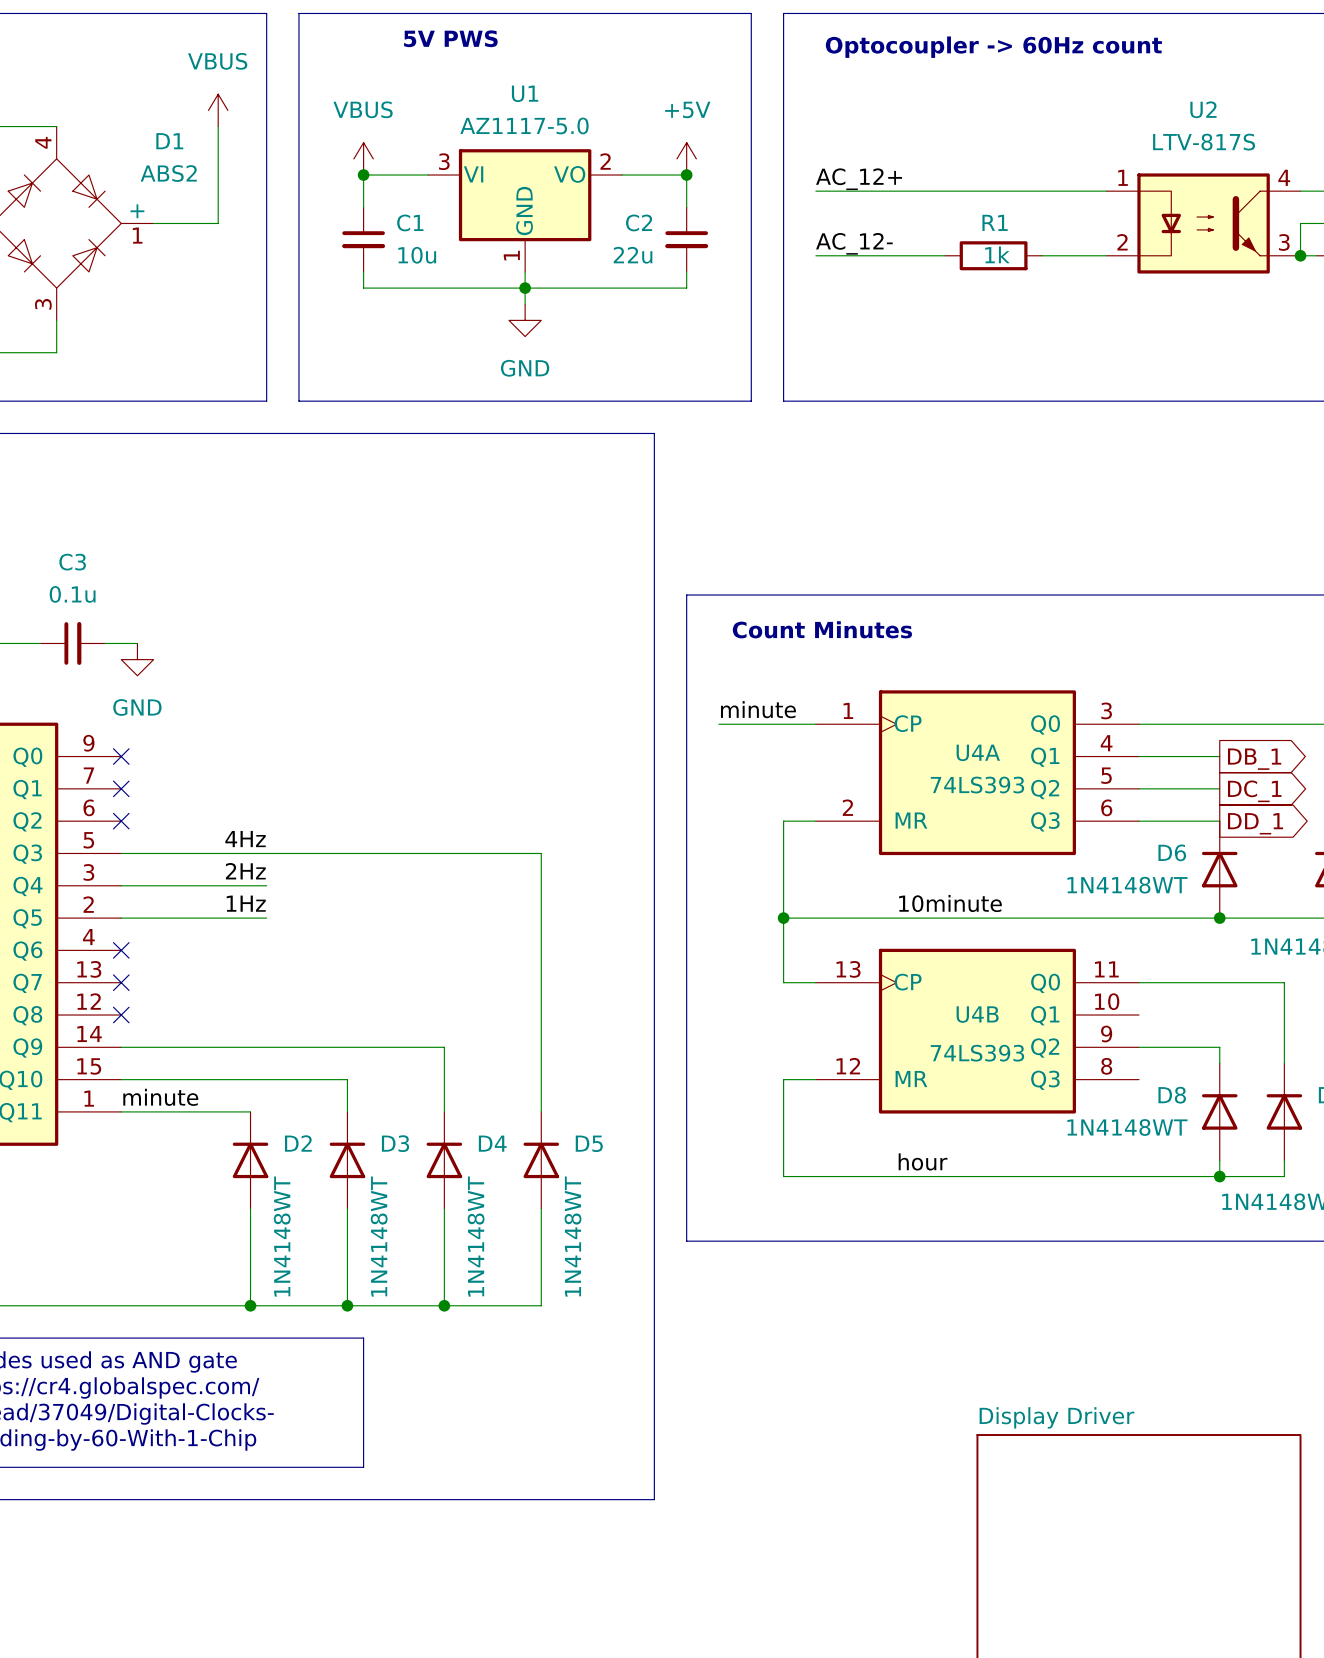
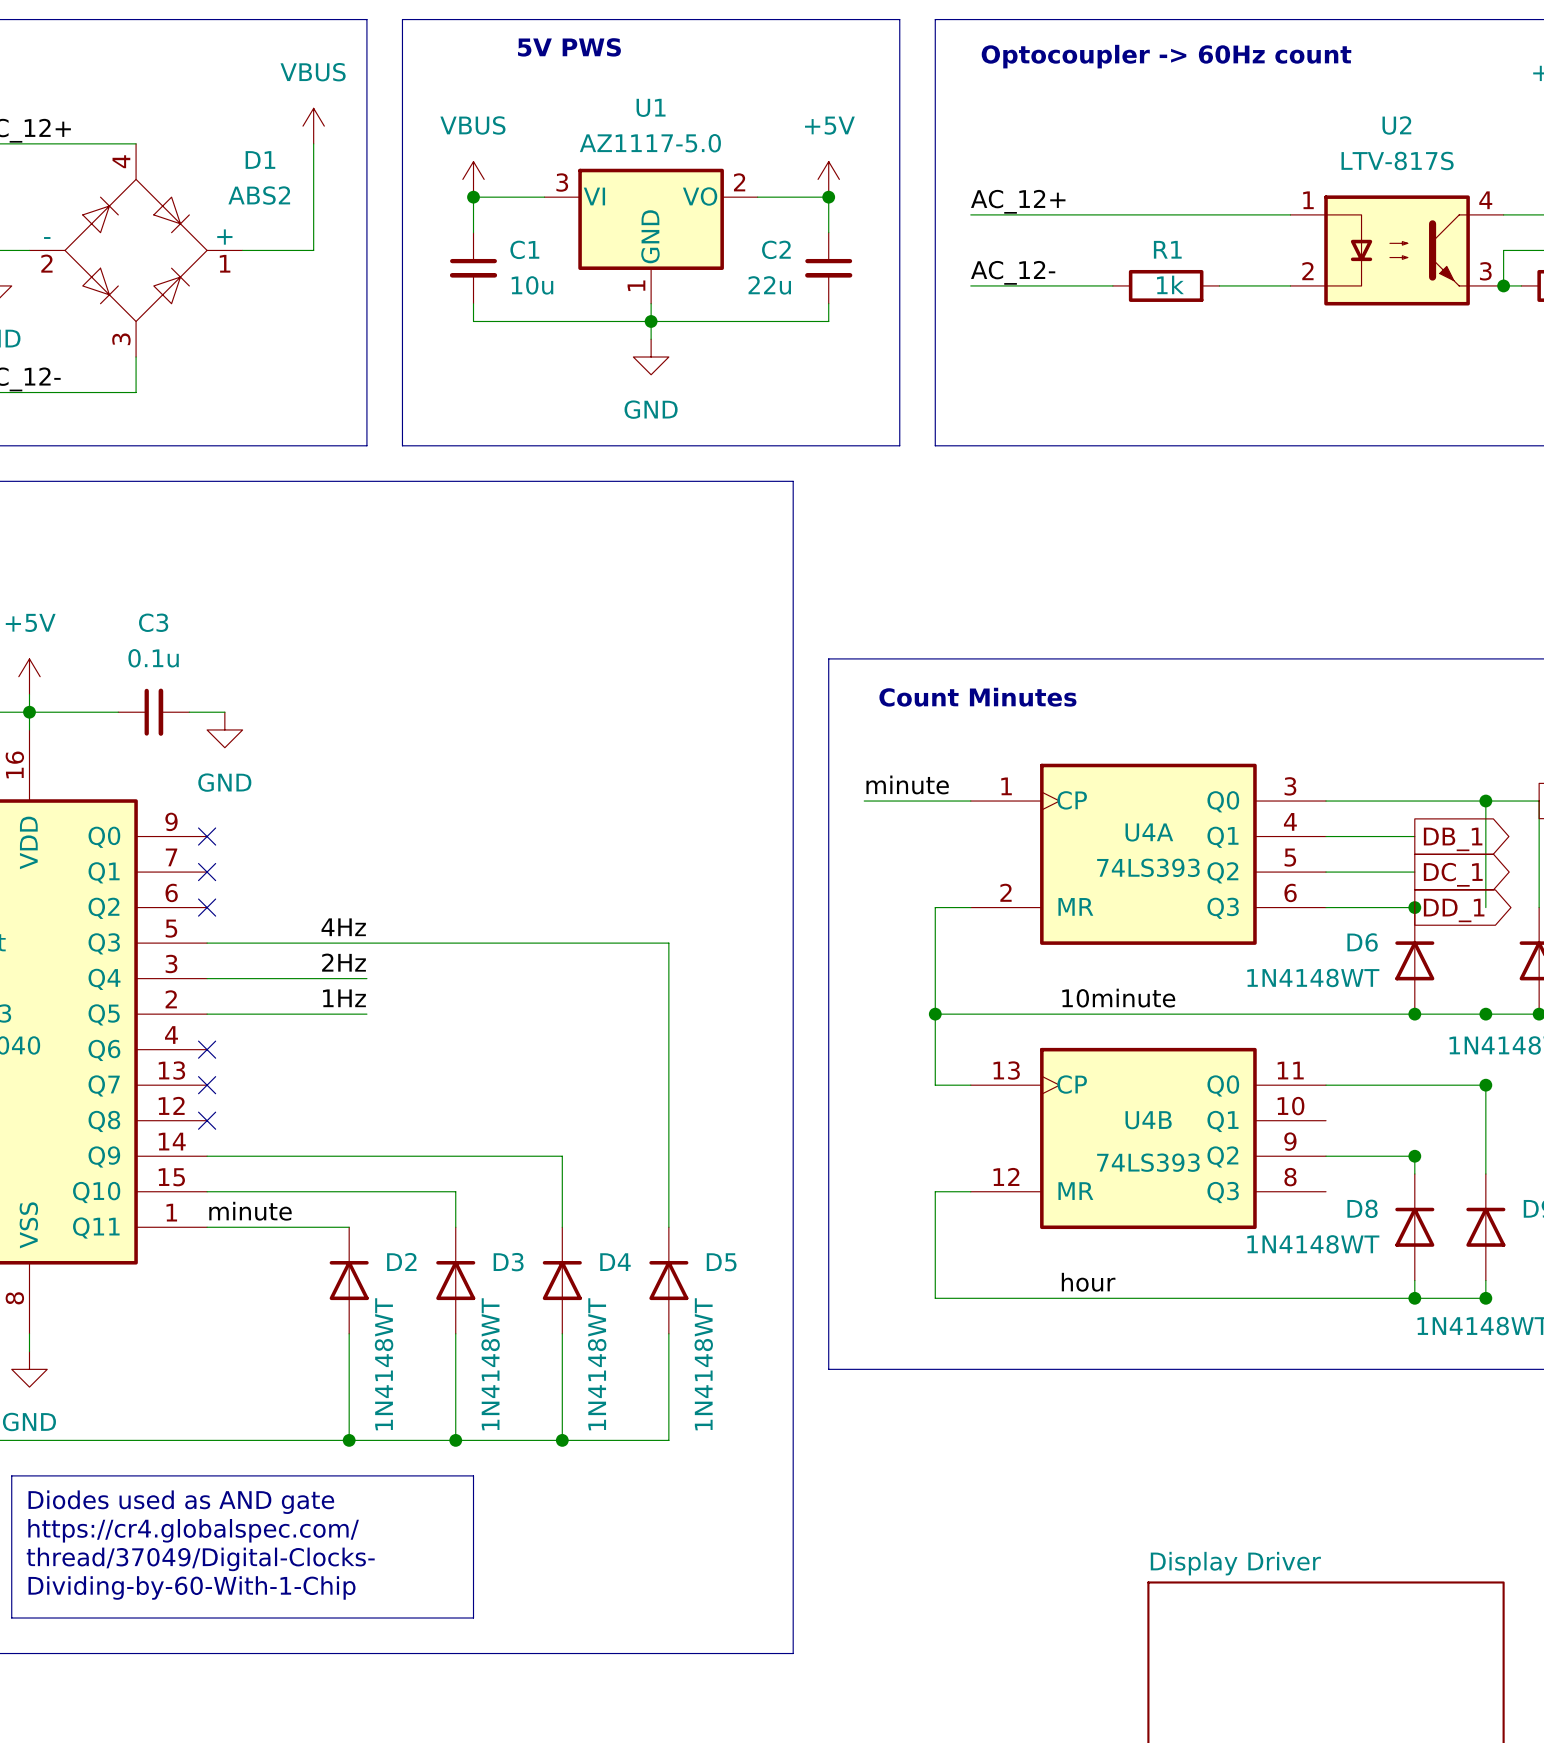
wire: none -> (1485, 801) (1485, 907)
junction: none -> (1485, 801)
junction: none -> (1414, 907)
junction: none -> (1485, 1014)
junction: none -> (1485, 1085)
junction: none -> (1414, 1156)
junction: none -> (1485, 1298)

